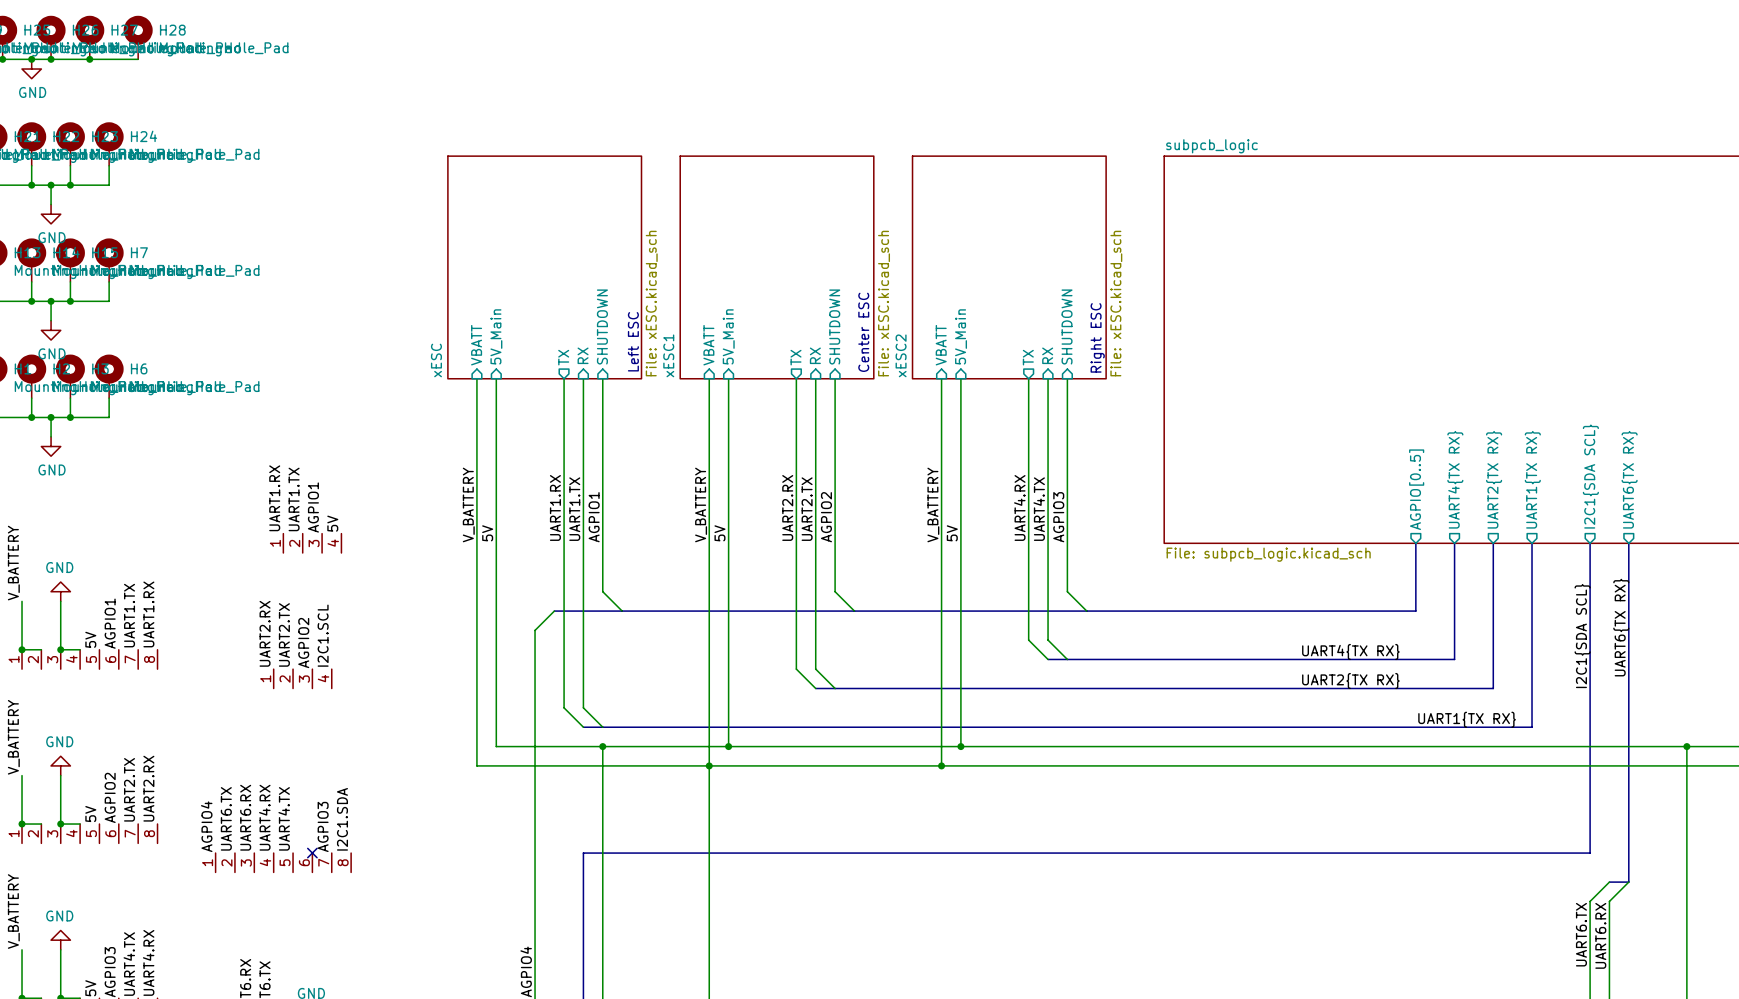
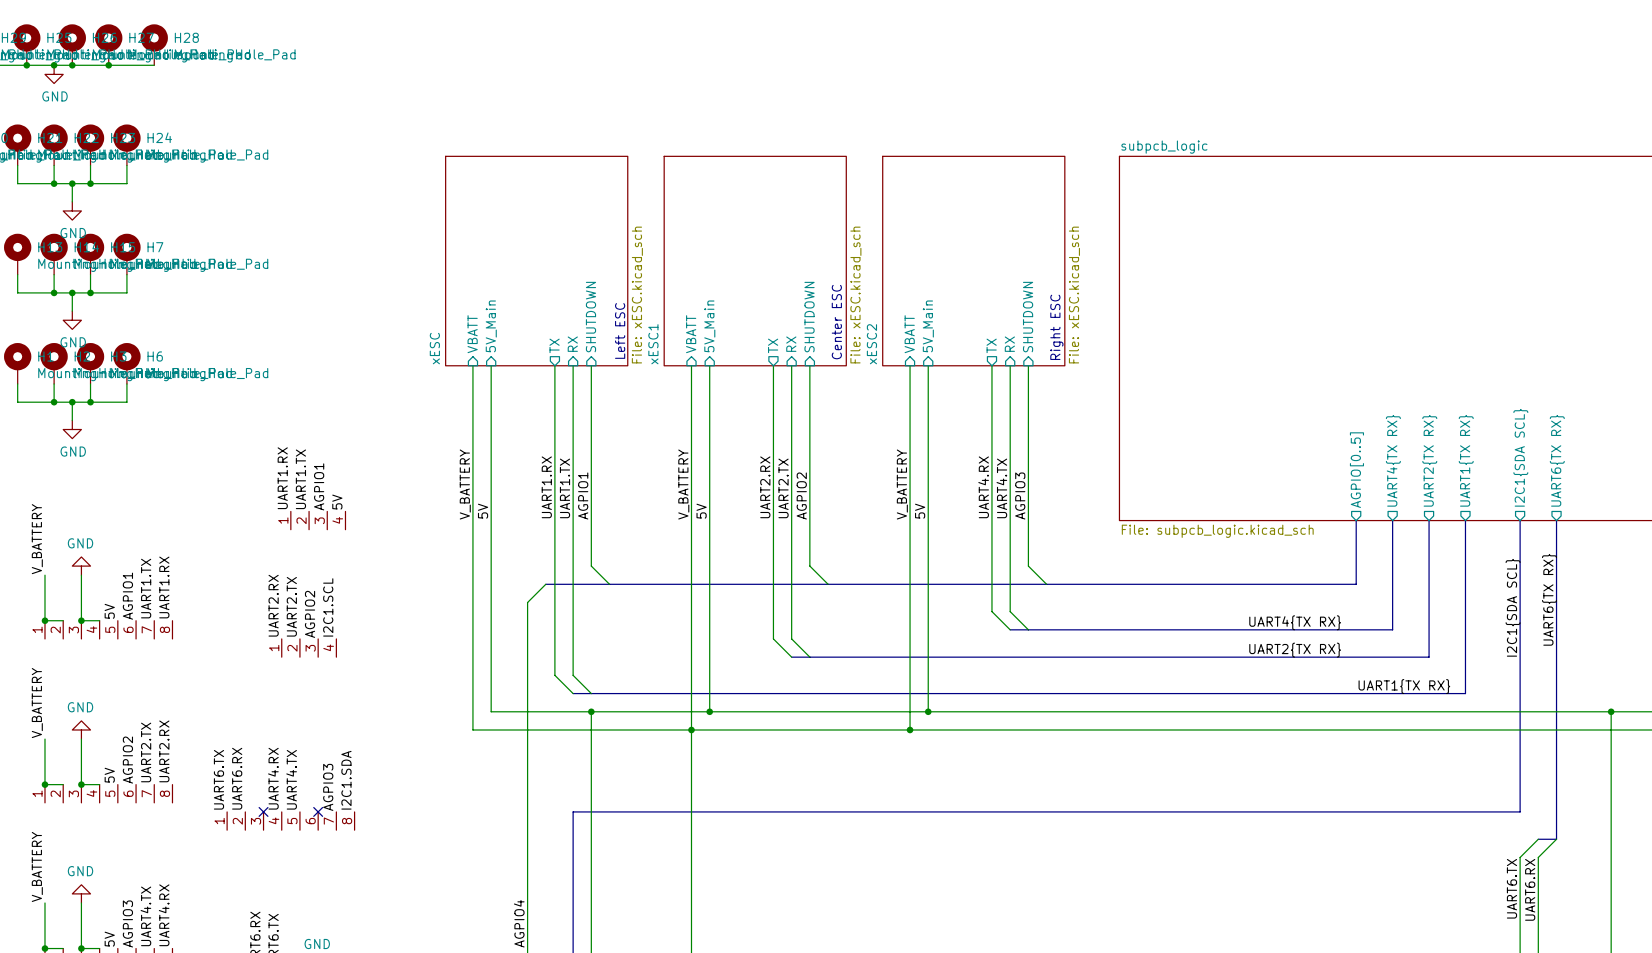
label: UART6.RX (245, 817) -> none
label: UART6.TX (226, 818) -> UART6.RX (237, 778)
label: AGPIO4 (206, 826) -> UART6.TX (218, 779)
no-connect mark: none -> (263, 811)

